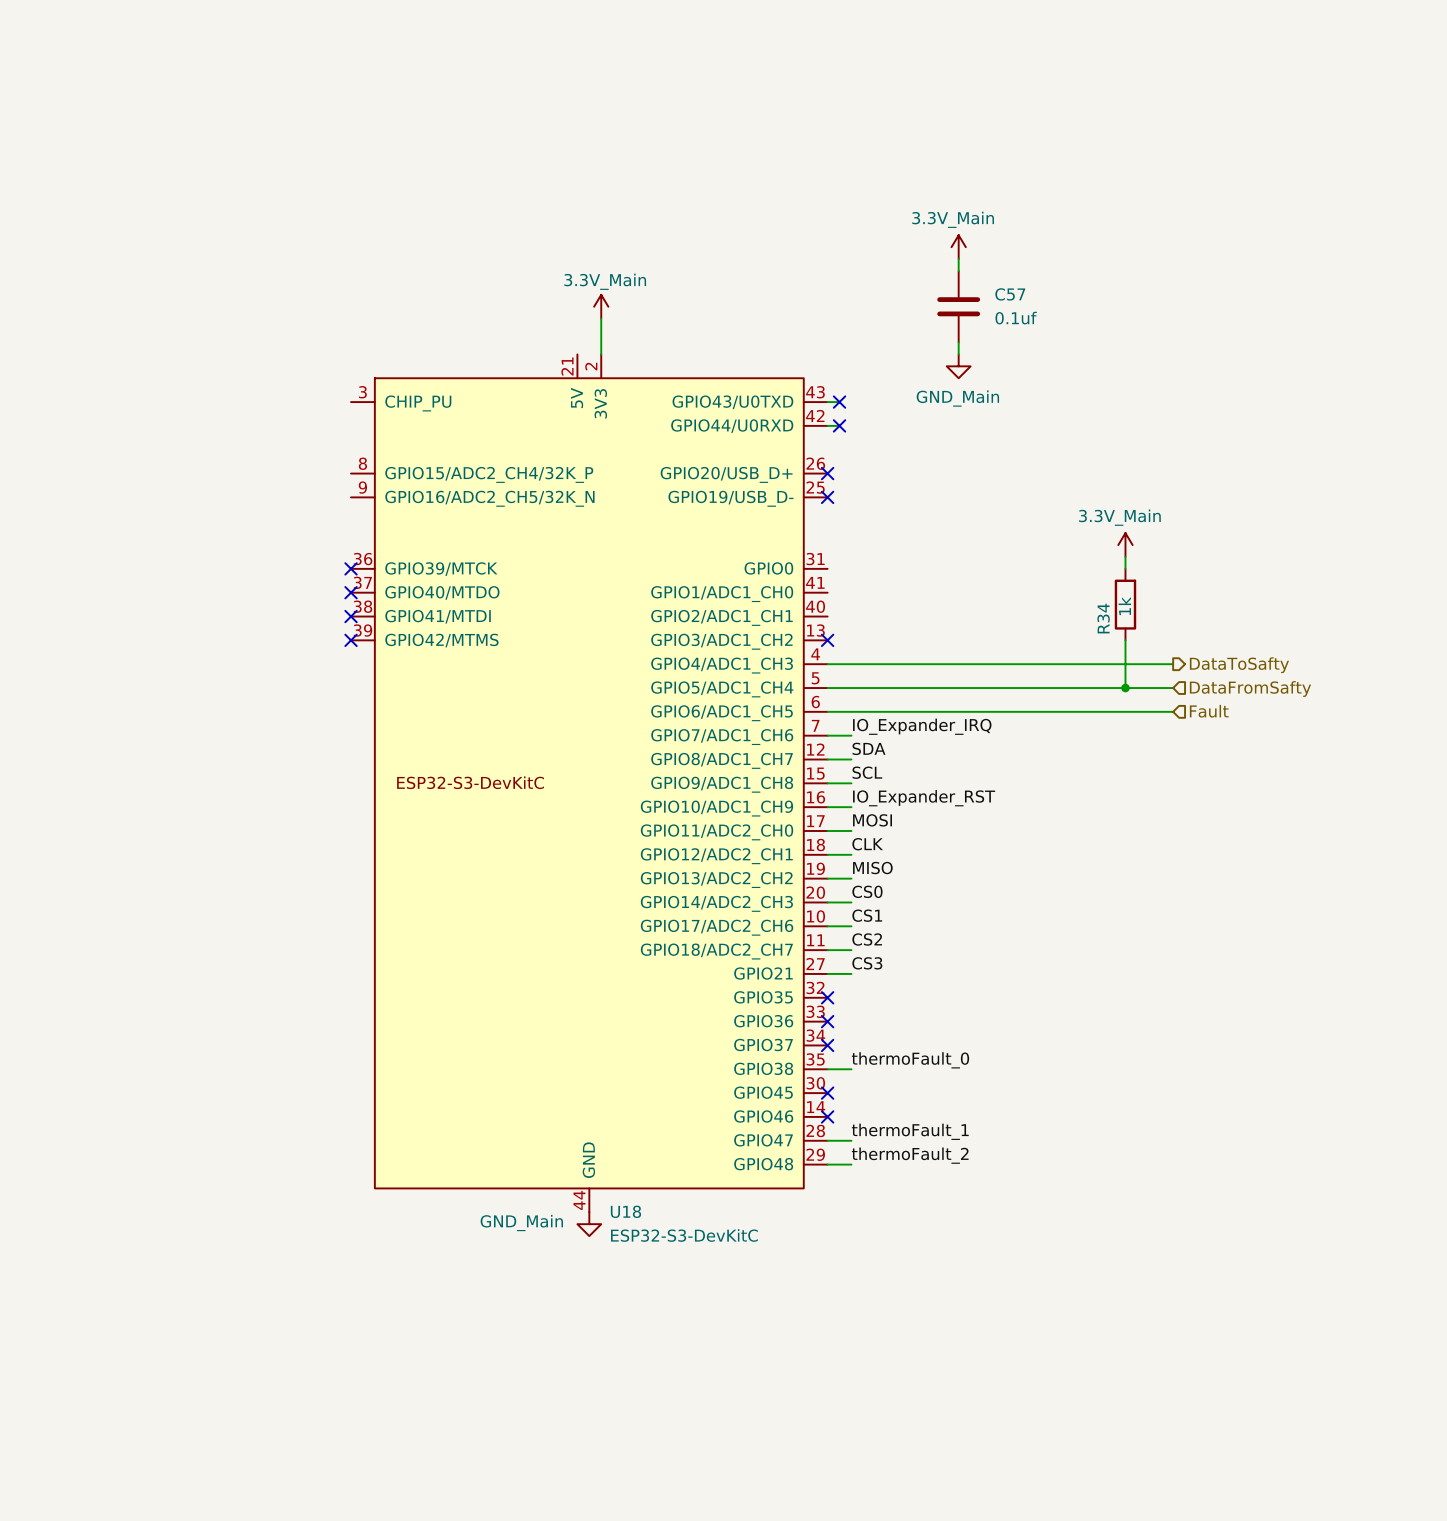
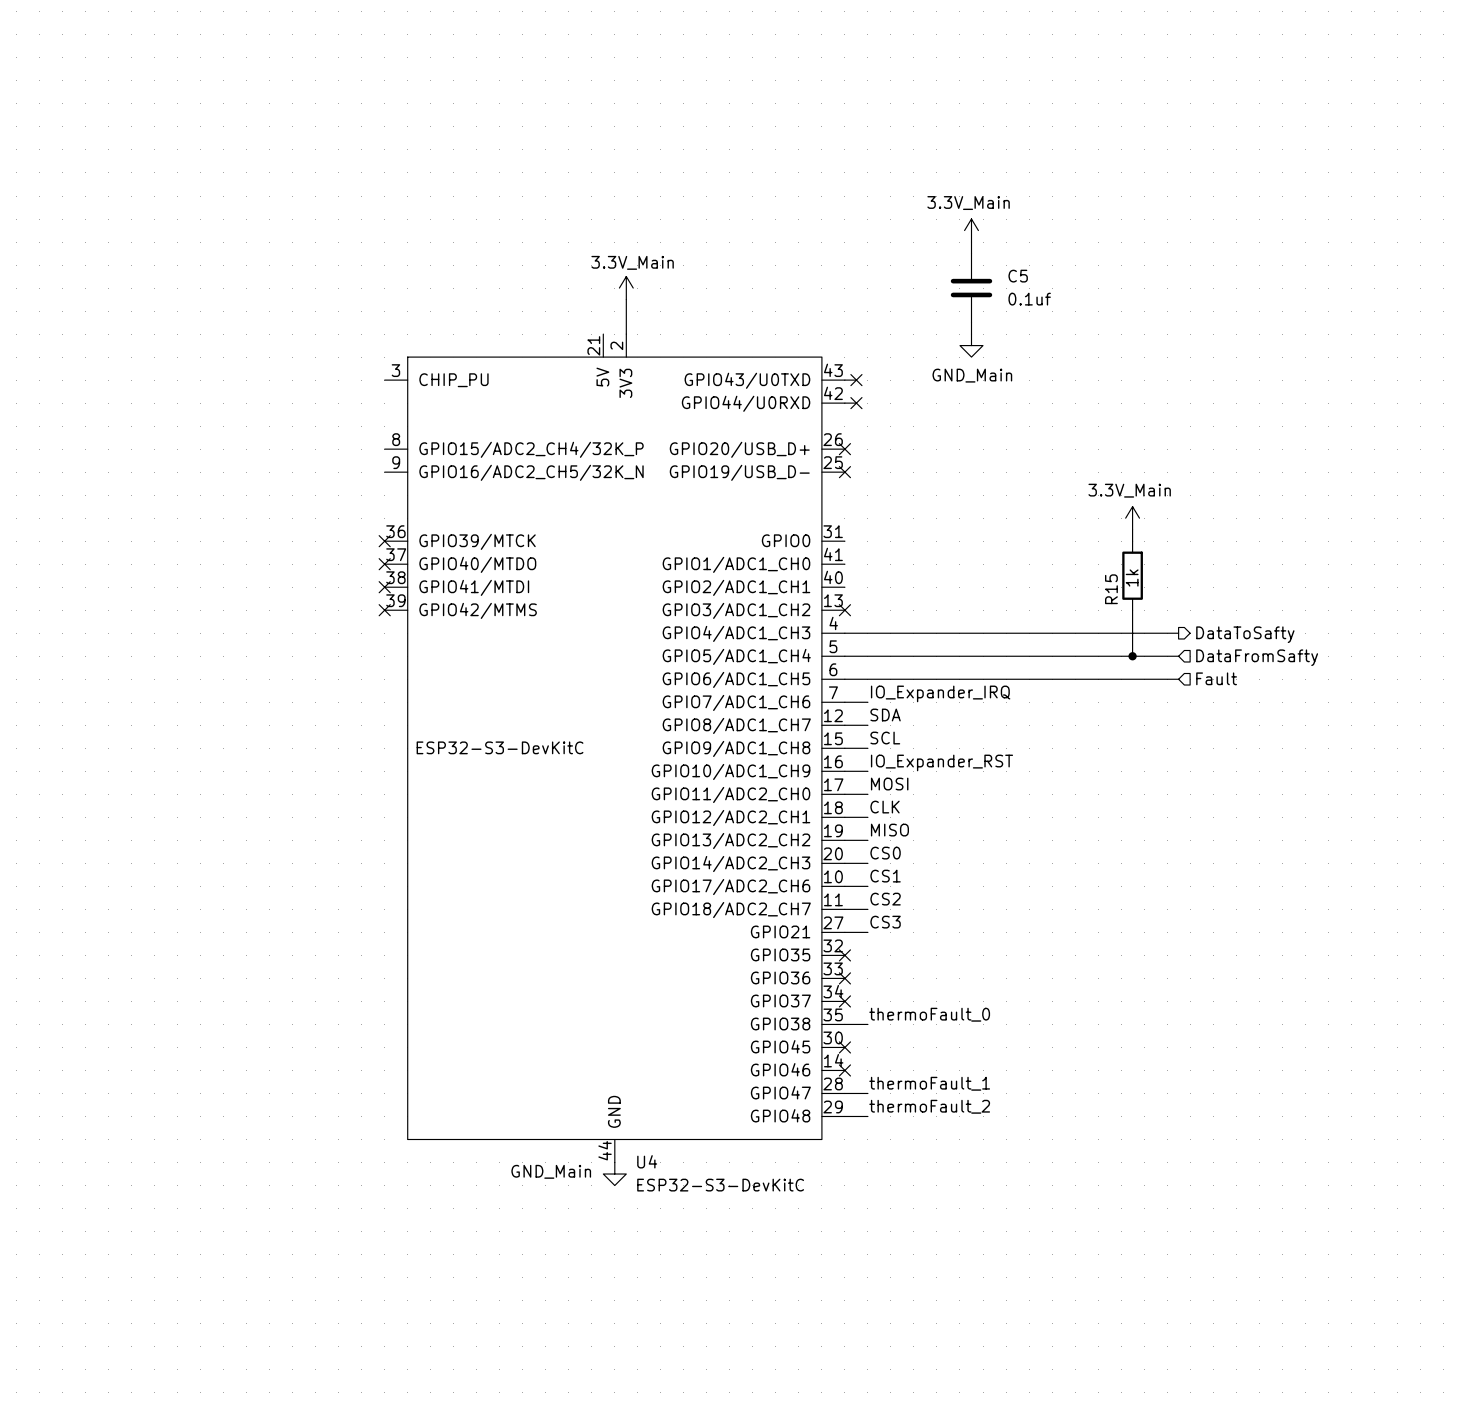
C57 name: C57 (1010, 294) -> C5 (1018, 276)
R34 name: R34 (1103, 618) -> R15 (1111, 589)
U18 name: U18 (625, 1211) -> U4 (647, 1161)

